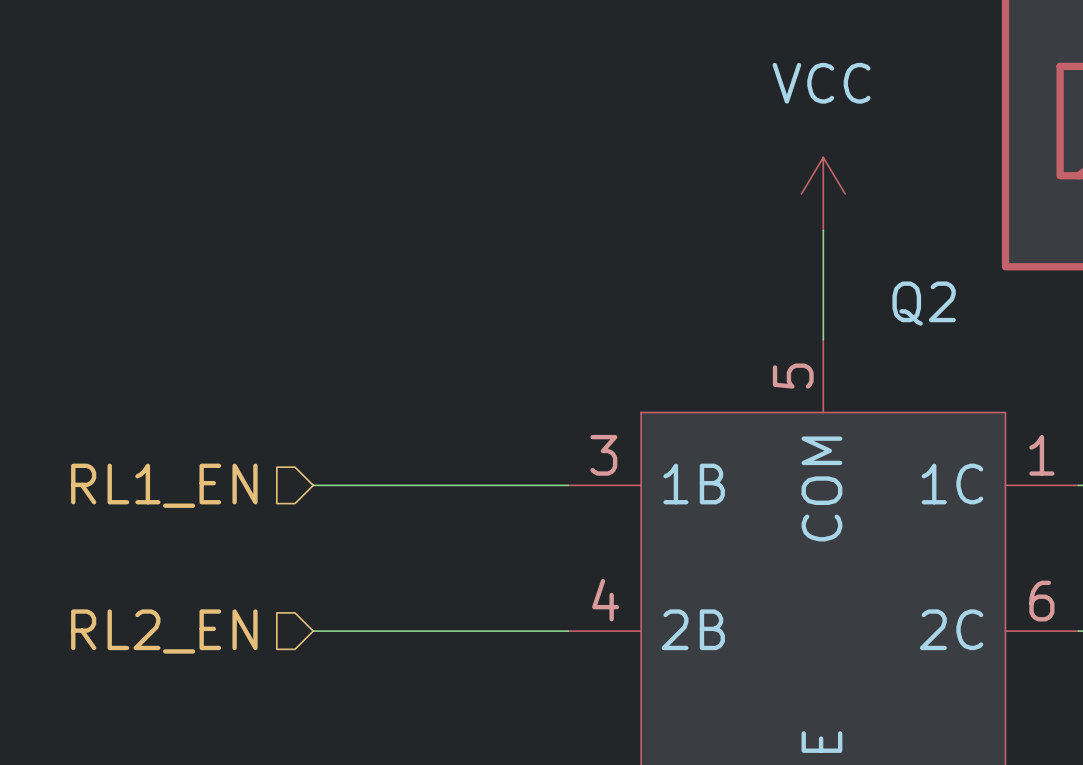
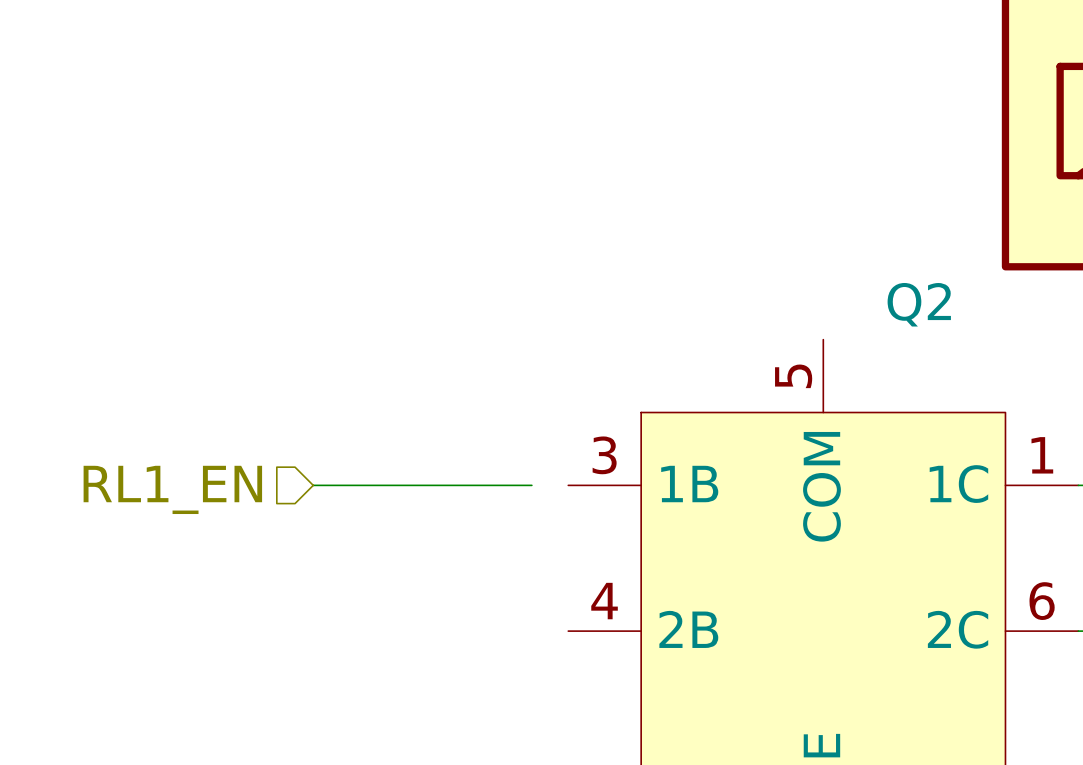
power symbol: VCC (823, 193) -> none
wire: (823, 230) (823, 339) -> none
wire: (531, 485) (568, 485) -> none
hierarchical label: RL2_EN (164, 631) -> none
wire: (313, 631) (568, 631) -> none

